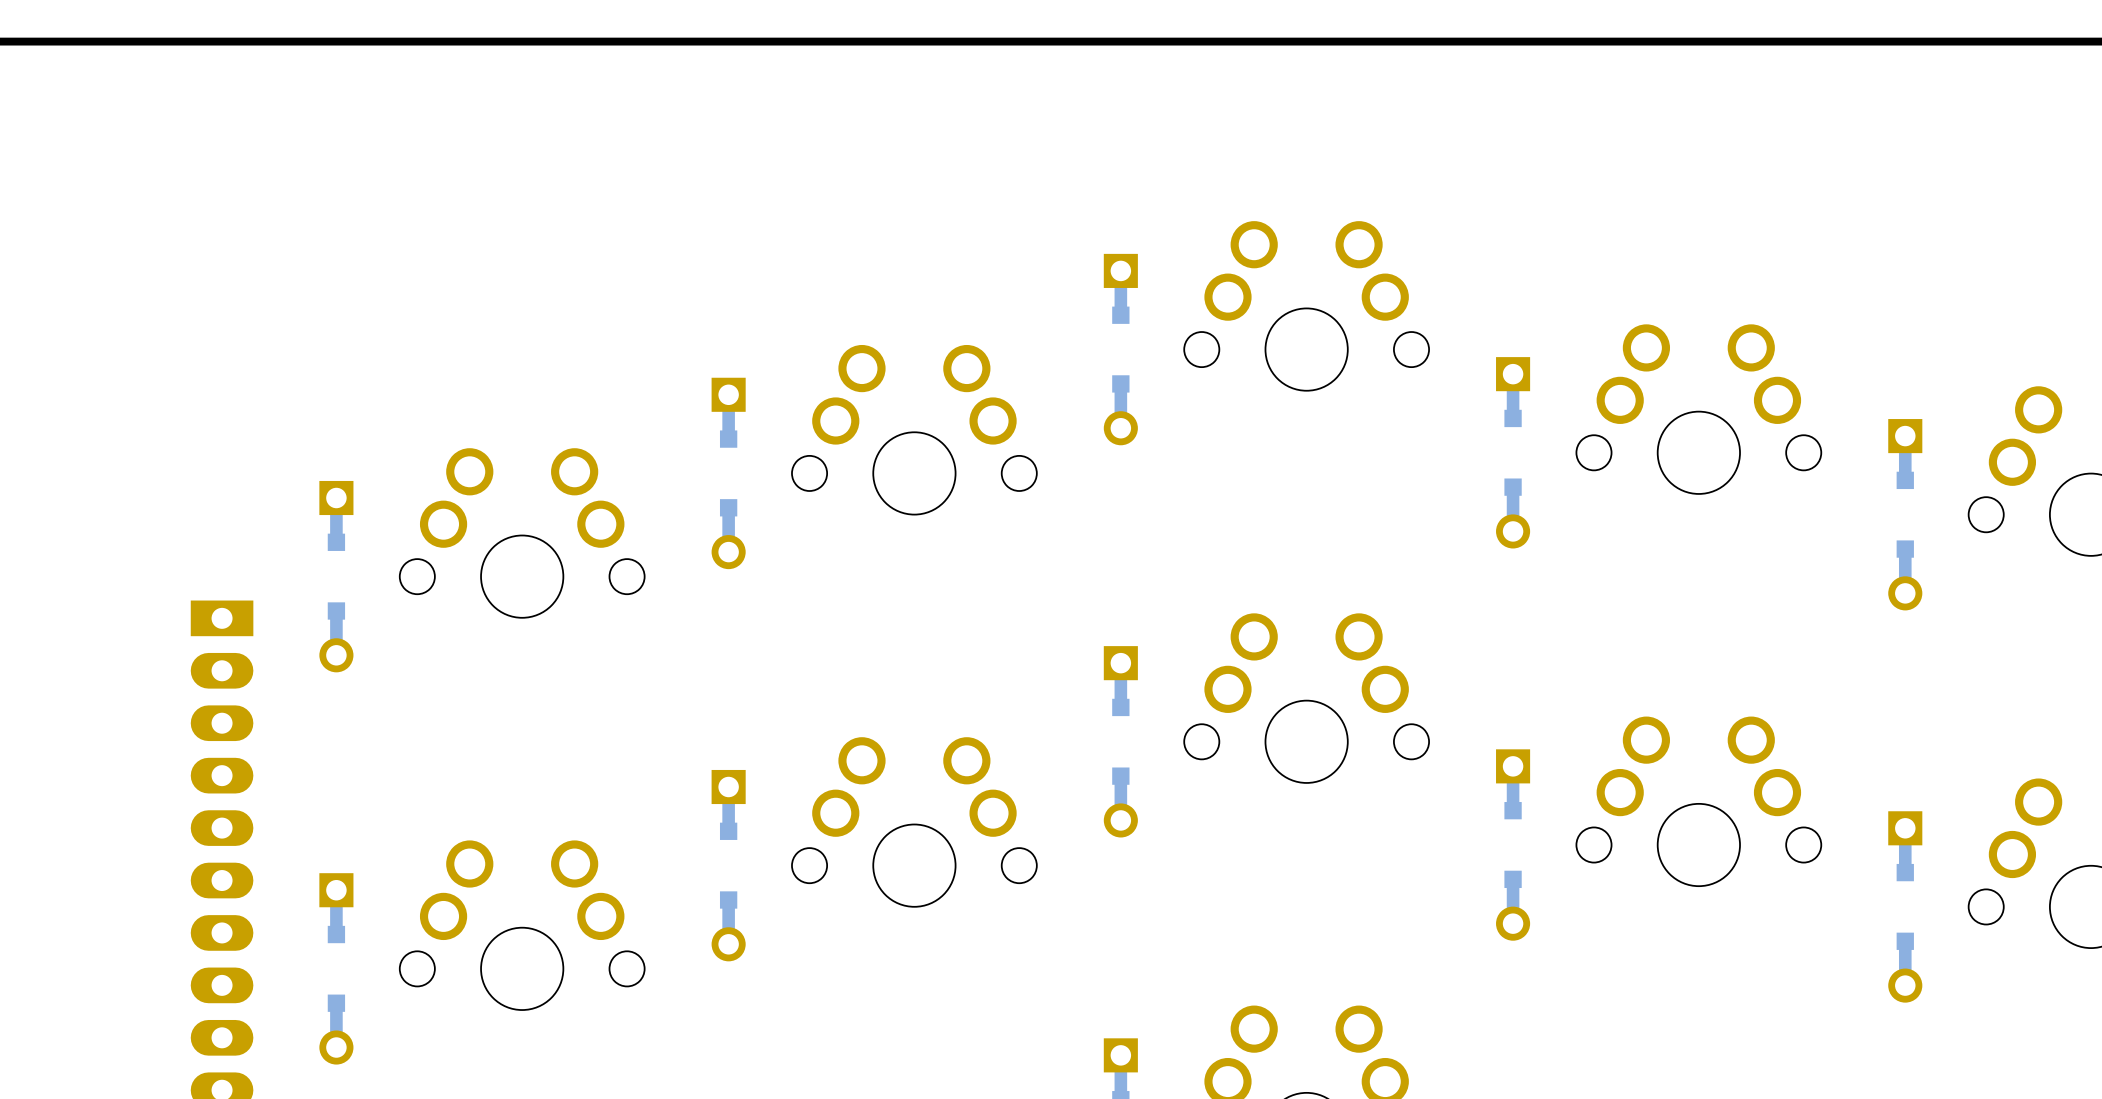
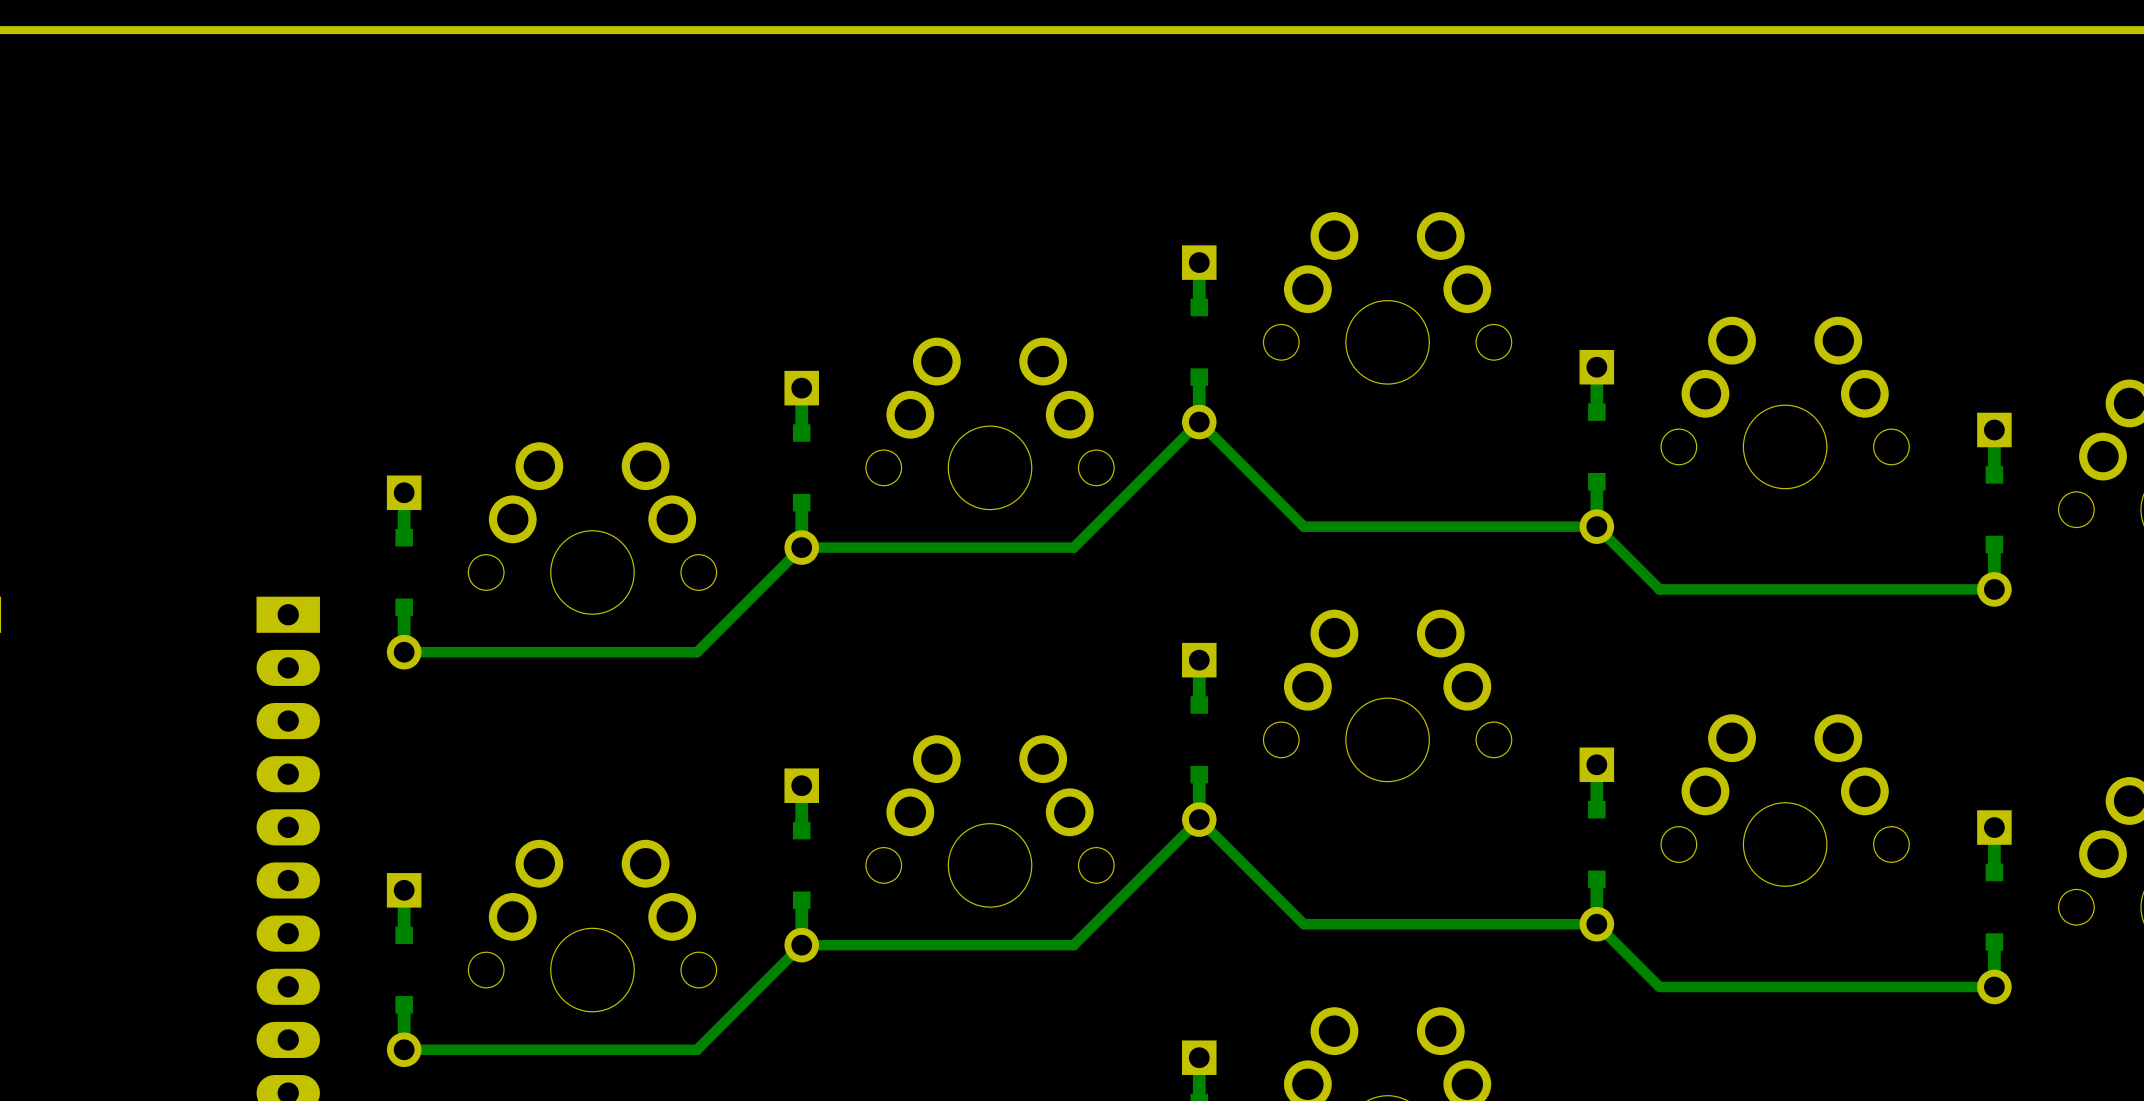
track: none -> (1994, 589) (1659, 589) (1596, 526) (1303, 526) (1199, 422) (1073, 547) (801, 547) (697, 652) (404, 652)
track: none -> (1994, 986) (1659, 986) (1596, 924) (1303, 924) (1199, 819) (1073, 945) (801, 945) (697, 1049) (404, 1049)

